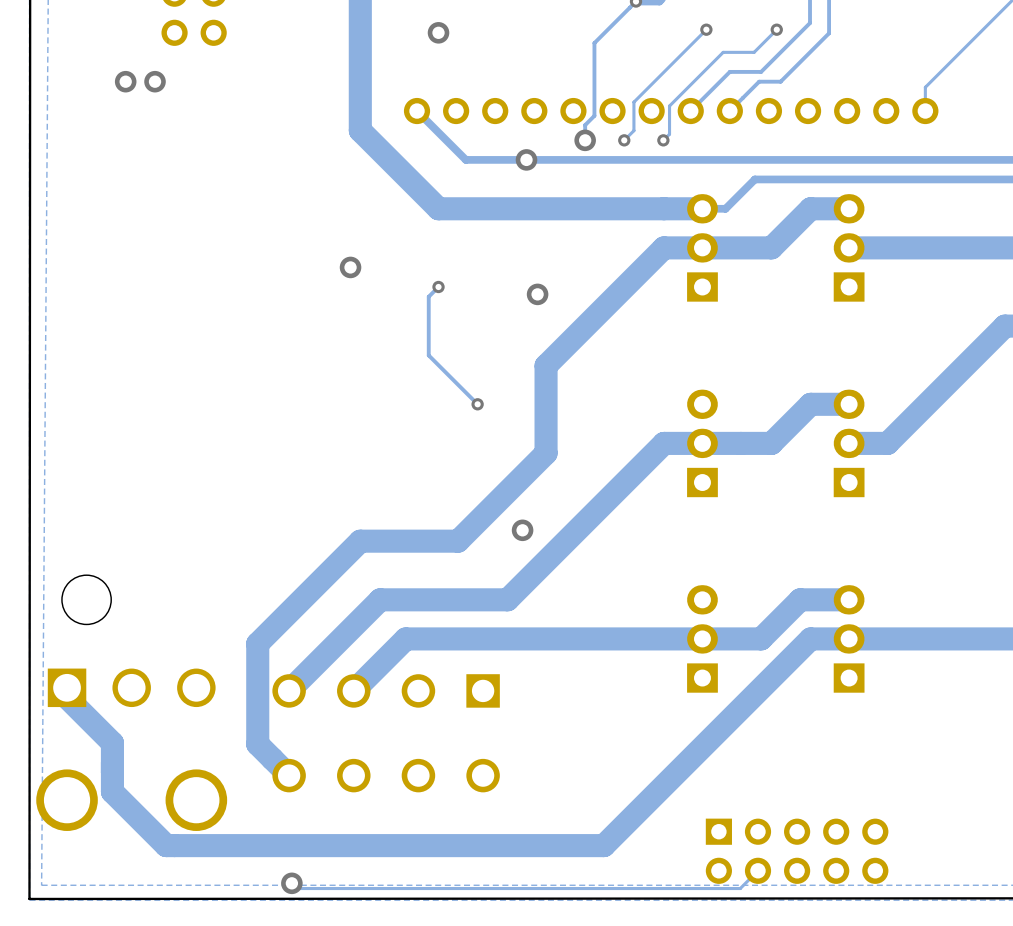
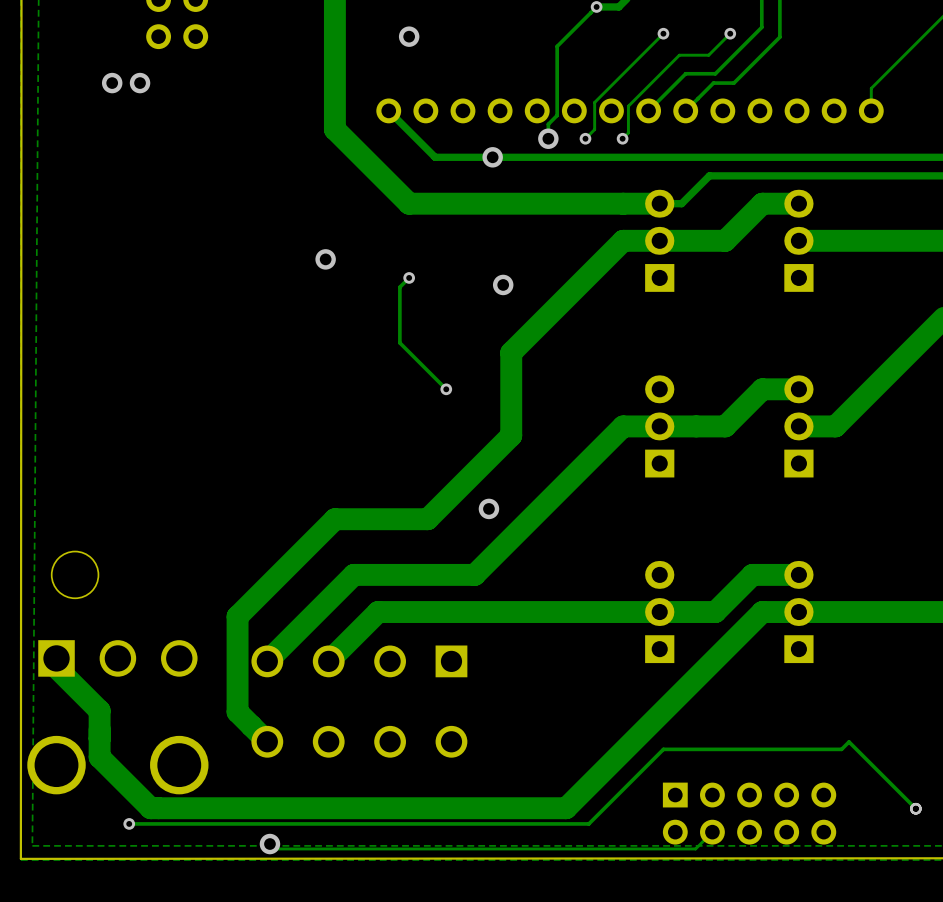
track: none -> (915, 808) (849, 741) (841, 749) (663, 749) (588, 823) (129, 823)
via: none -> (915, 808)
via: none -> (129, 823)

